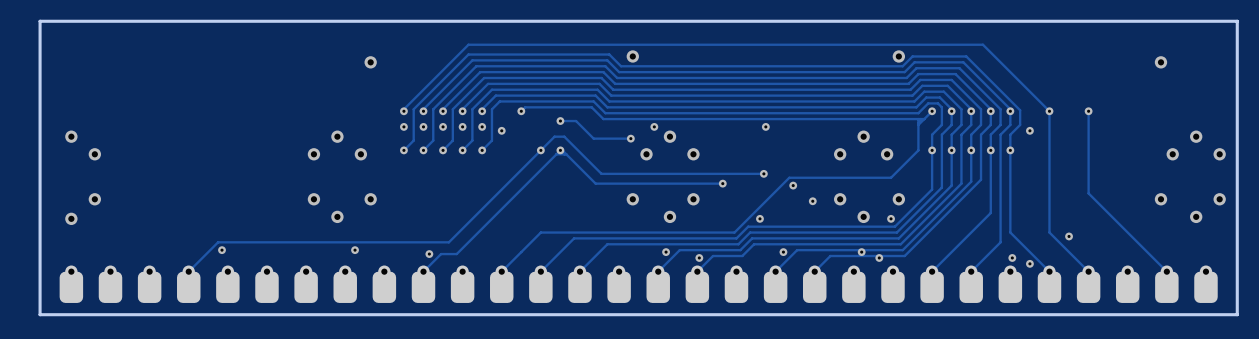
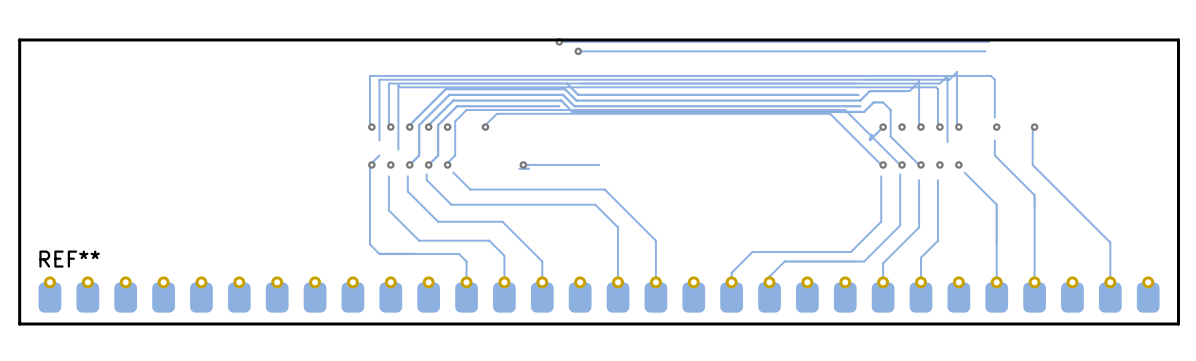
via: none -> (559, 41)
track: none -> (989, 41) (559, 41)
via: none -> (578, 51)
track: none -> (985, 51) (578, 51)
via: (632, 56) -> none
via: (898, 56) -> none
via: (370, 62) -> none
track: (914, 62) (904, 72) (619, 72) (607, 60) (472, 60) (423, 111) -> (866, 79) (379, 79) (379, 140)
track: (963, 62) (1010, 109) (1010, 124) (1000, 134) (1000, 242) (971, 271) -> (938, 180) (938, 240) (920, 257) (920, 282)
track: none -> (913, 79) (949, 79) (956, 72) (956, 127)
via: (1160, 62) -> none
track: (476, 66) (433, 109) (433, 140) (423, 150) -> (441, 83) (388, 83) (388, 127)
track: (621, 66) (609, 54) (468, 54) (413, 109) (413, 140) (403, 150) -> (582, 83) (566, 83)
track: (902, 66) (912, 56) (966, 56) (1020, 110) (1020, 124) (1010, 134) (1010, 232) (1049, 271) -> (854, 83) (939, 83) (947, 75) (947, 142)
track: (955, 74) (990, 109) (990, 124) (981, 134) (981, 179) (904, 256) (830, 256) (814, 271) -> (905, 91) (909, 91) (919, 81) (919, 127)
track: (906, 78) (916, 68) (959, 68) (1000, 109) (1000, 124) (990, 134) (990, 212) (932, 271) -> (919, 180) (919, 227) (883, 263) (883, 282)
track: (932, 85) (947, 85) (971, 109) (971, 124) (961, 134) (961, 183) (900, 244) (754, 244) (742, 256) (713, 256) (697, 271) -> (883, 102) (890, 110) (890, 136) (919, 164)
track: (597, 89) (609, 101) (914, 101) (924, 91) (943, 91) (961, 109) (961, 124) (951, 134) (951, 185) (898, 238) (752, 238) (740, 250) (679, 250) (658, 271) -> (426, 174) (426, 180) (451, 204) (595, 204) (618, 227) (618, 282)
track: (908, 89) (920, 79) (951, 79) (981, 109) (981, 124) (971, 134) (971, 181) (902, 250) -> (900, 174) (900, 225) (864, 261) (854, 261)
track: none -> (994, 117) (994, 79) (991, 75) (369, 75) (369, 127)
track: (403, 111) (468, 44) (982, 44) (1049, 111) (1049, 191) -> (964, 172) (996, 204)
track: (482, 111) (495, 95) (595, 95) (607, 107) (916, 107) (926, 97) (939, 97) (951, 109) (951, 124) (941, 134) (941, 187) (896, 232) (750, 232) (738, 244) (607, 244) (579, 271) -> (407, 176) (407, 191) (438, 221) (502, 221) (542, 261) (542, 282)
track: none -> (483, 127) (496, 113) (830, 113) (881, 164)
track: (521, 111) (525, 107) (591, 107) (603, 119) (924, 119) -> none
track: none -> (938, 127) (938, 89) (936, 87) (400, 87) (398, 85) (398, 149)
track: none -> (1032, 127) (1032, 164) (1110, 242) (1110, 282)
track: (1088, 111) (1088, 181) -> (994, 140) (994, 155) (1034, 195)
track: (918, 119) (918, 150) (891, 177) (789, 177) (734, 232) (540, 232) (501, 271) -> none
track: (560, 121) (576, 121) (593, 138) (630, 138) -> none
via: (560, 121) -> none
via: (403, 126) -> none
via: (423, 126) -> none
via: (443, 126) -> none
via: (462, 126) -> none
via: (482, 126) -> none
via: (654, 126) -> none
via: (765, 126) -> none
via: (501, 130) -> none
via: (1029, 130) -> none
via: (71, 136) -> none
via: (337, 136) -> none
via: (669, 136) -> none
via: (863, 136) -> none
via: (1196, 136) -> none
via: (630, 138) -> none
track: (482, 150) (491, 140) (491, 109) (499, 101) (593, 101) (605, 113) (918, 113) (928, 103) (937, 103) (941, 107) (941, 124) (932, 134) (932, 189) (894, 226) (748, 226) (736, 238) (574, 238) (540, 271) -> (388, 176) (388, 210) (419, 240) (489, 240) (504, 255) (504, 282)
via: (540, 150) -> none
track: (562, 150) (595, 183) (722, 183) -> (525, 164) (599, 164)
track: none -> (900, 164) (845, 110) (466, 110) (455, 121) (455, 155) (445, 164)
via: (94, 154) -> none
via: (313, 154) -> none
via: (360, 154) -> none
track: (564, 154) (560, 150) (456, 254) (441, 254) (423, 271) -> none
via: (646, 154) -> none
via: (693, 154) -> none
via: (840, 154) -> none
via: (887, 154) -> none
via: (1172, 154) -> none
via: (1219, 154) -> none
track: none -> (453, 172) (470, 189) (604, 189) (655, 240) (655, 278)
track: none -> (881, 176) (881, 221) (850, 252) (752, 252) (731, 272) (731, 282)
track: (763, 173) (601, 173) (564, 136) (554, 136) (448, 242) -> (466, 282) (466, 261) (458, 253) (415, 253)
via: (763, 173) -> none
via: (722, 183) -> none
via: (793, 185) -> none
track: (1088, 193) (1166, 271) -> (1034, 206) (1034, 282)
via: (94, 199) -> none
via: (313, 199) -> none
via: (370, 199) -> none
via: (632, 199) -> none
via: (693, 199) -> none
via: (840, 199) -> none
via: (898, 199) -> none
via: (1160, 199) -> none
via: (1219, 199) -> none
via: (812, 201) -> none
via: (337, 216) -> none
via: (669, 216) -> none
via: (863, 216) -> none
via: (1196, 216) -> none
via: (71, 218) -> none
via: (759, 218) -> none
via: (891, 218) -> none
track: (1049, 232) (1088, 271) -> (996, 244) (996, 282)
via: (1069, 236) -> none
track: (411, 242) (218, 242) (188, 271) -> (379, 253) (369, 244) (369, 164) (379, 155)
part text: none -> REF** (69, 259)
via: (222, 250) -> none
via: (355, 250) -> none
track: (830, 250) (797, 250) (775, 271) -> (784, 261) (769, 276) (769, 282)
via: (666, 252) -> none
via: (783, 252) -> none
via: (861, 252) -> none
via: (429, 254) -> none
via: (699, 257) -> none
via: (879, 257) -> none
via: (1012, 257) -> none
via: (1029, 263) -> none

